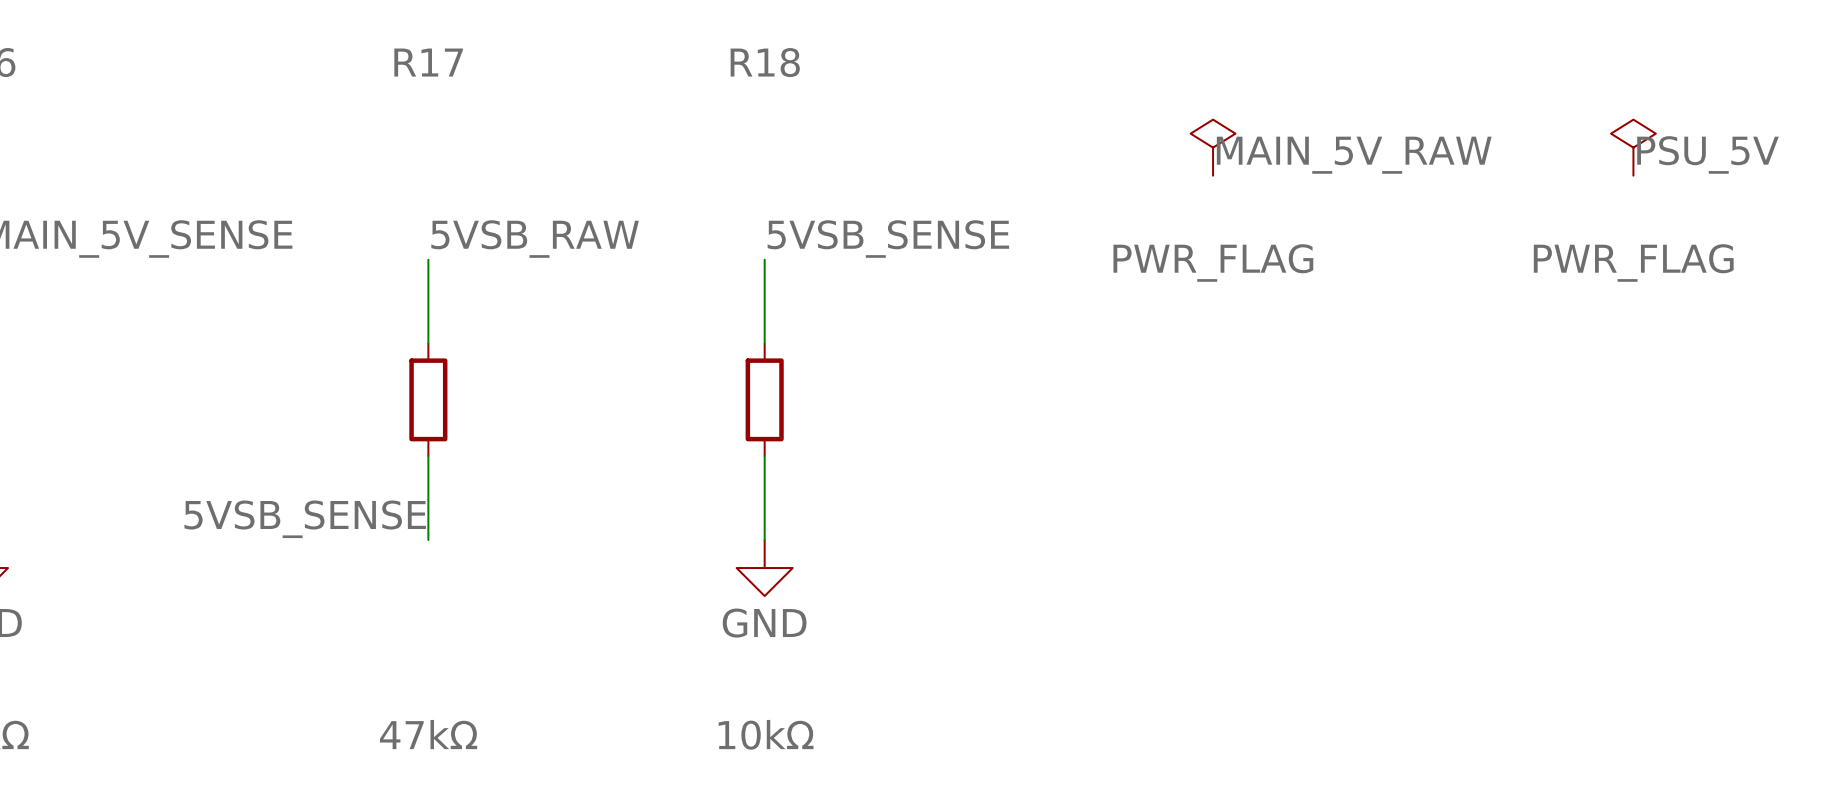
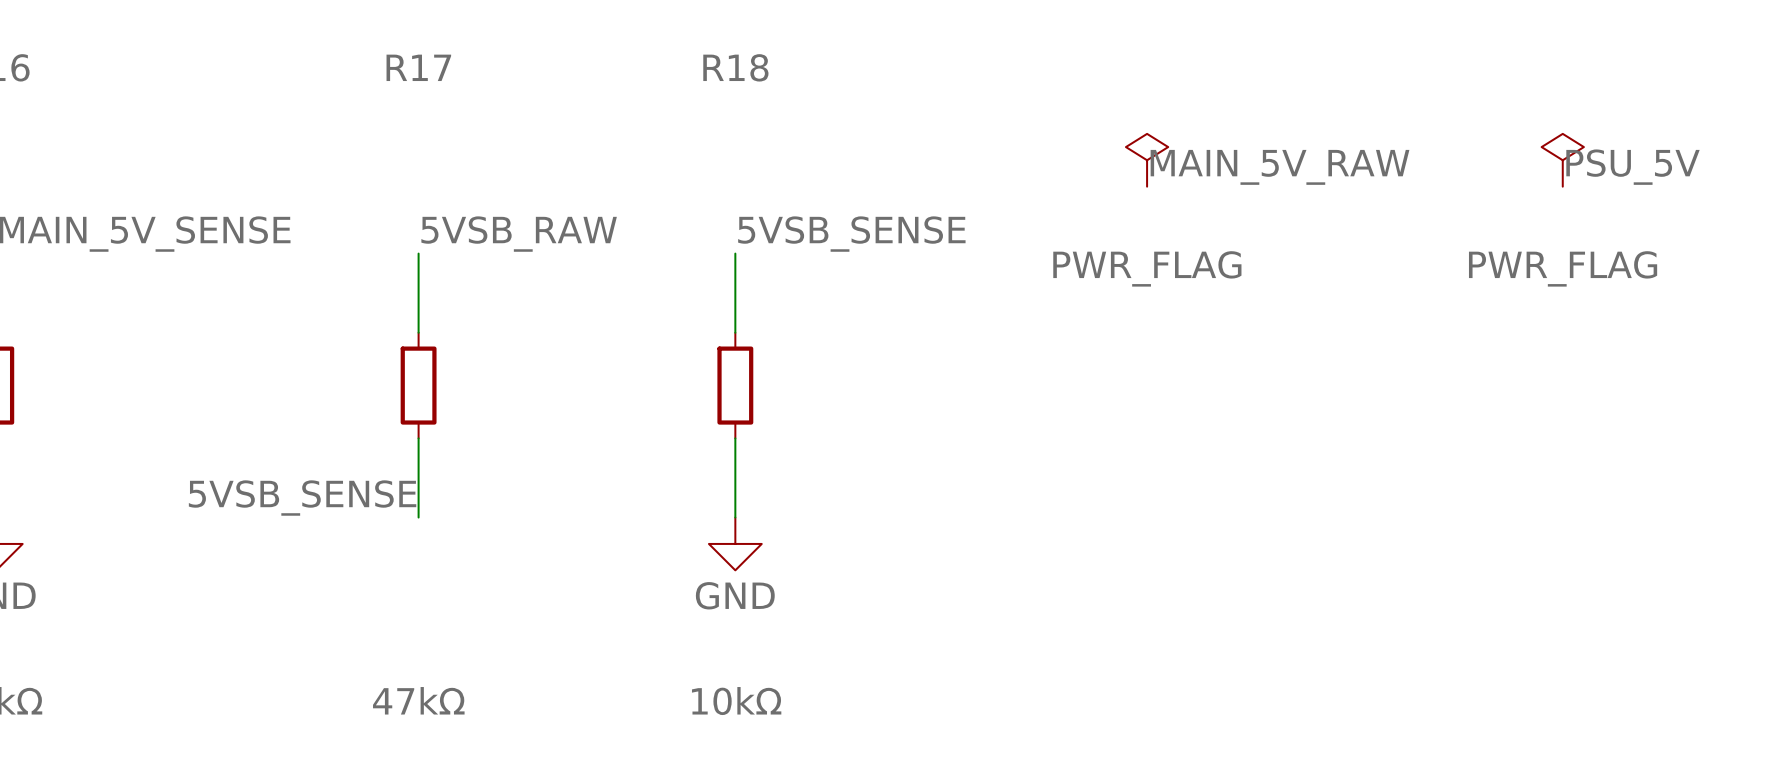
power symbol position: PWR_FLAG (1213, 147) -> PWR_FLAG (1147, 160)
power symbol position: PWR_FLAG (1633, 147) -> PWR_FLAG (1562, 160)
label position: PSU_5V (1707, 154) -> PSU_5V (1633, 167)
label position: MAIN_5V_RAW (1354, 155) -> MAIN_5V_RAW (1280, 167)

